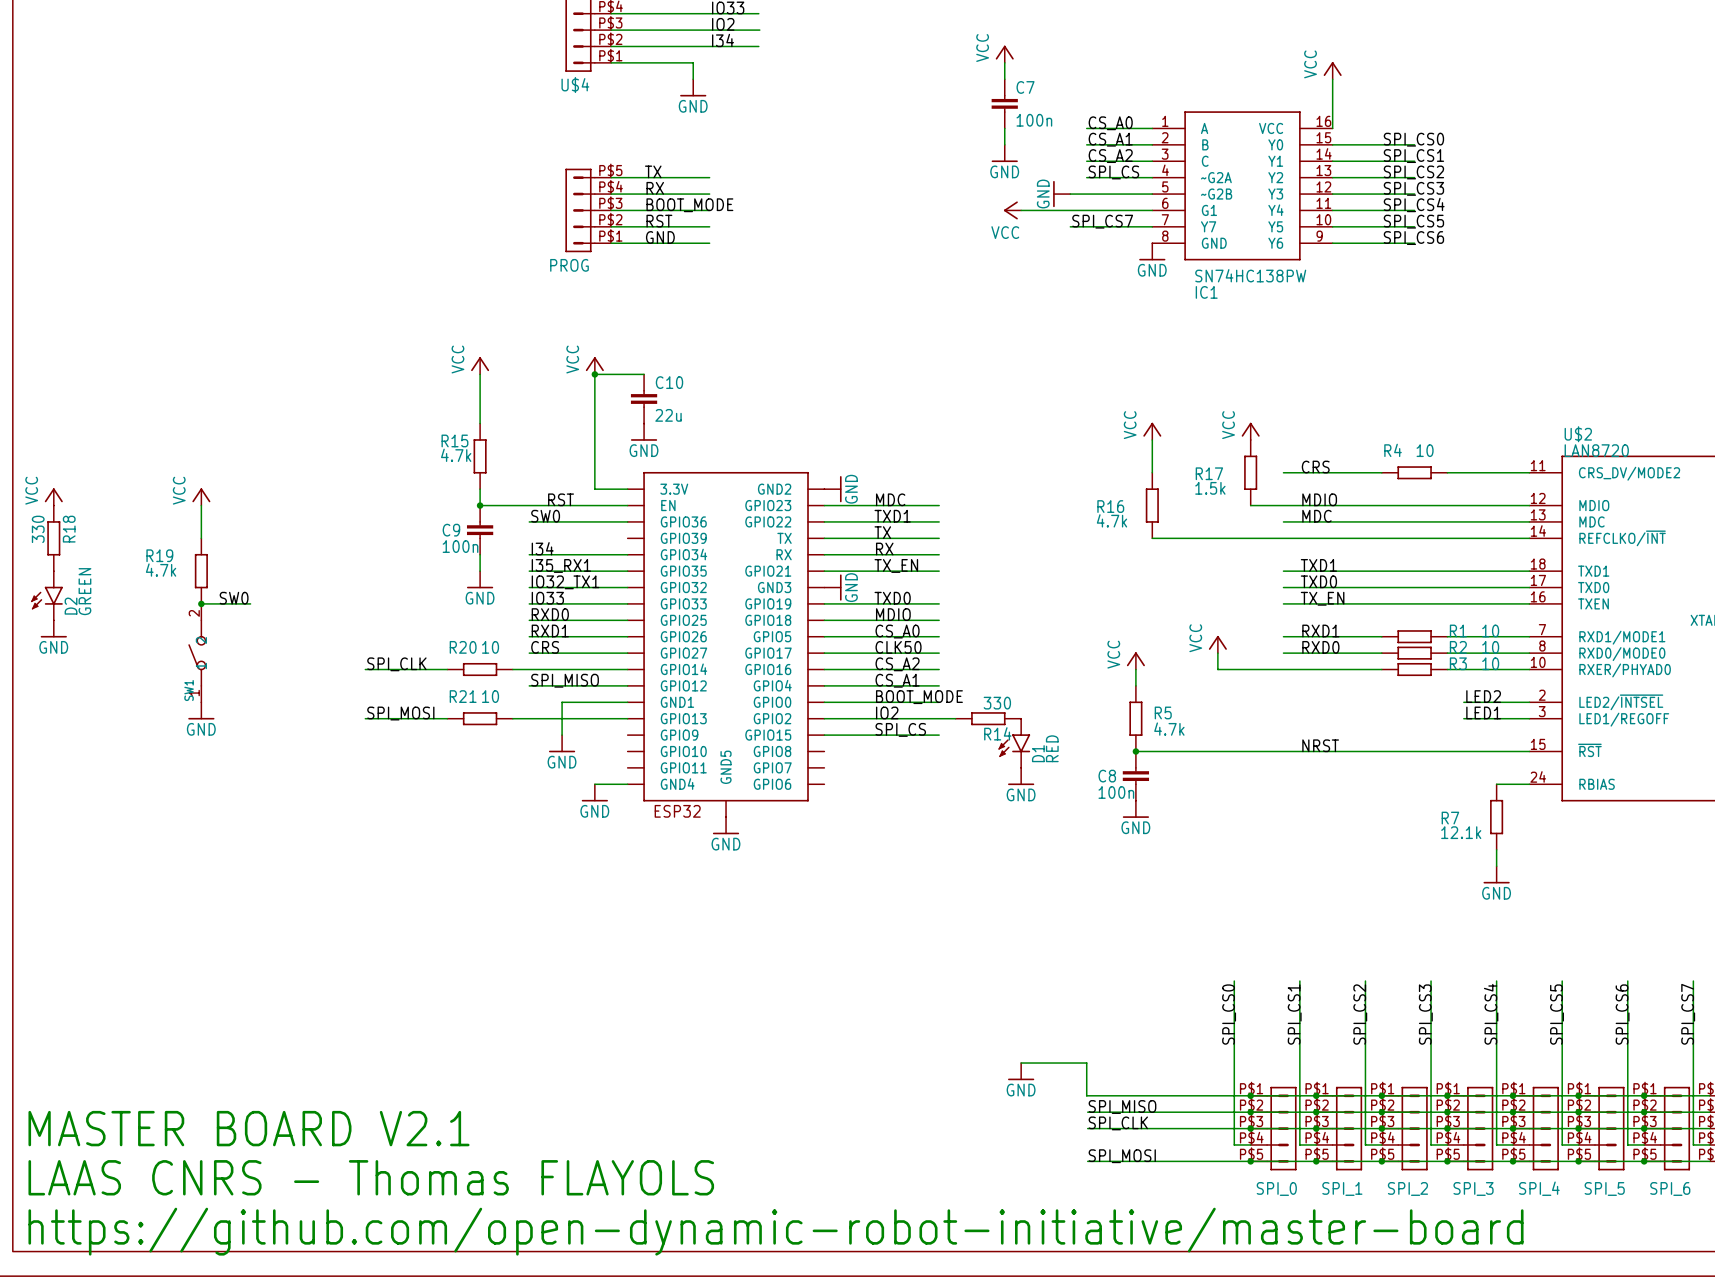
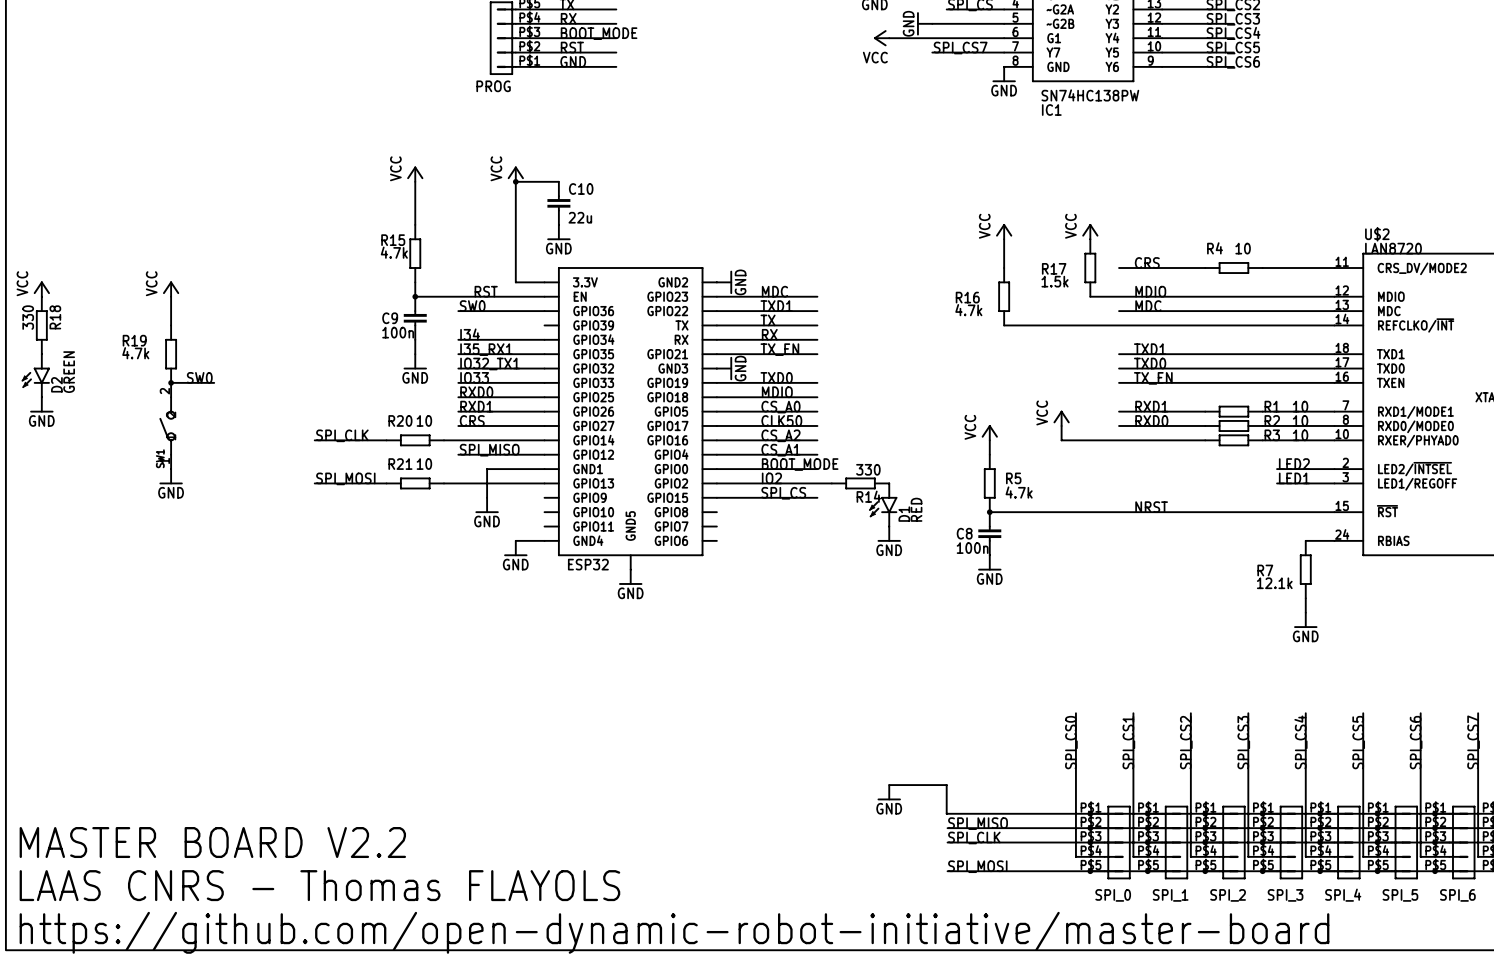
text: MASTER BOARD V2.1 (249, 1128) -> MASTER BOARD V2.2 (212, 842)

